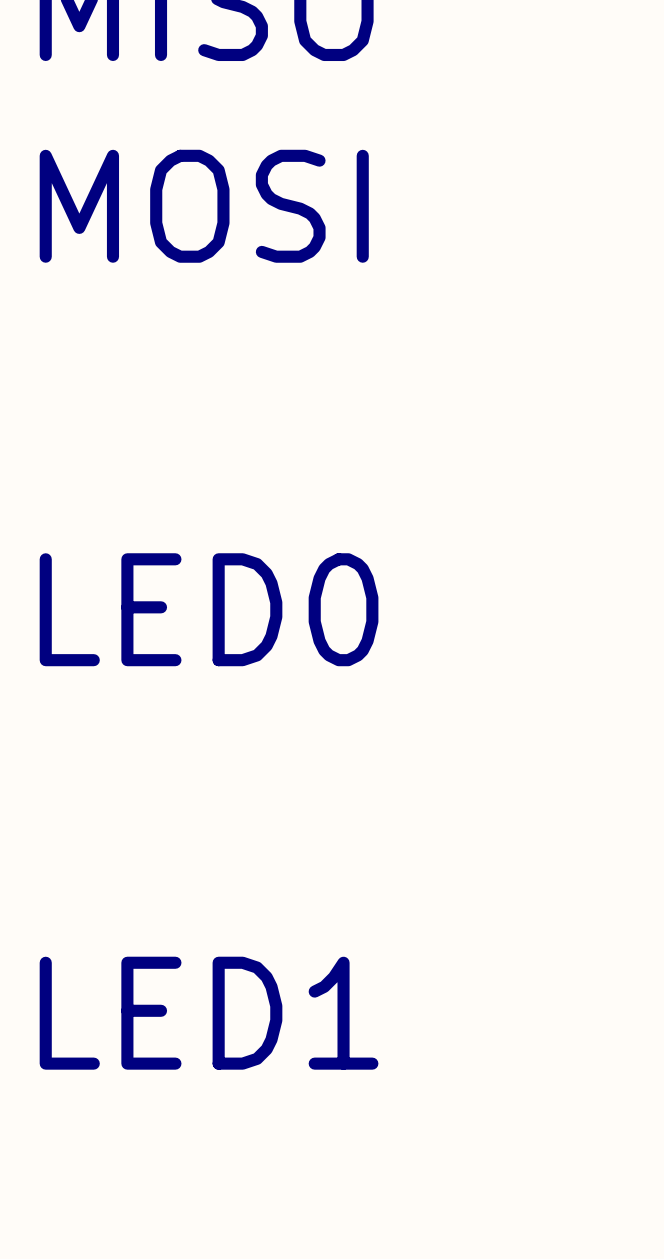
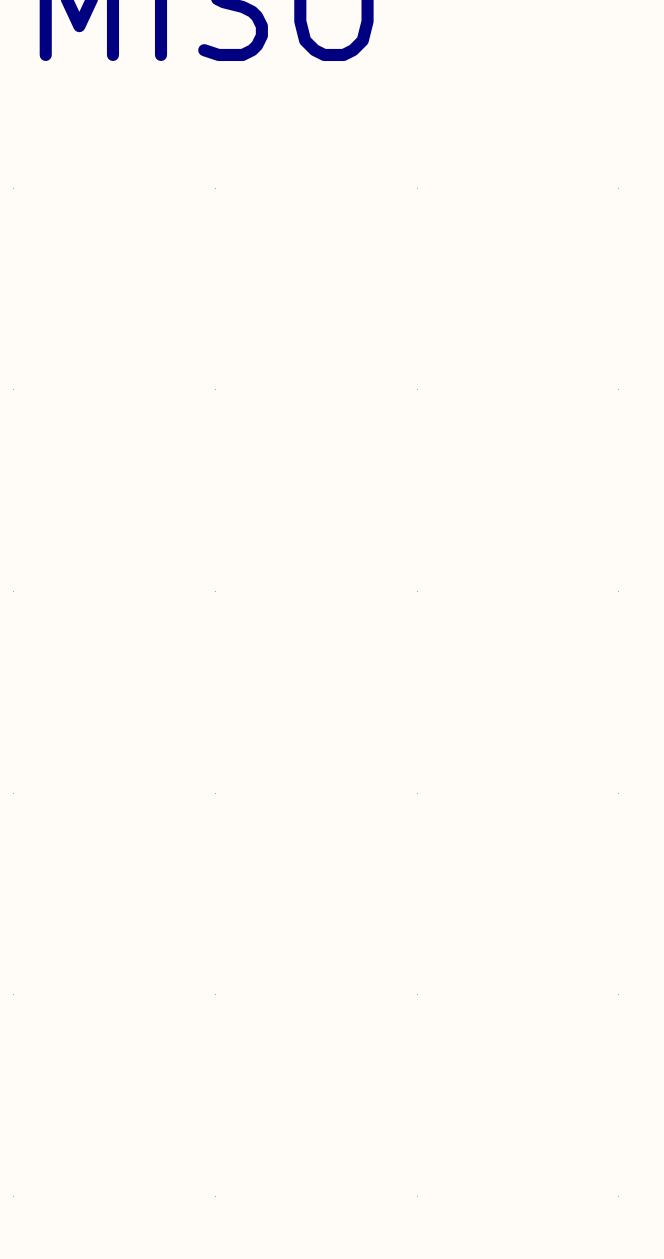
text: MOSI (204, 206) -> none
text: LED0 (209, 609) -> none
text: LED1 (209, 1013) -> none

